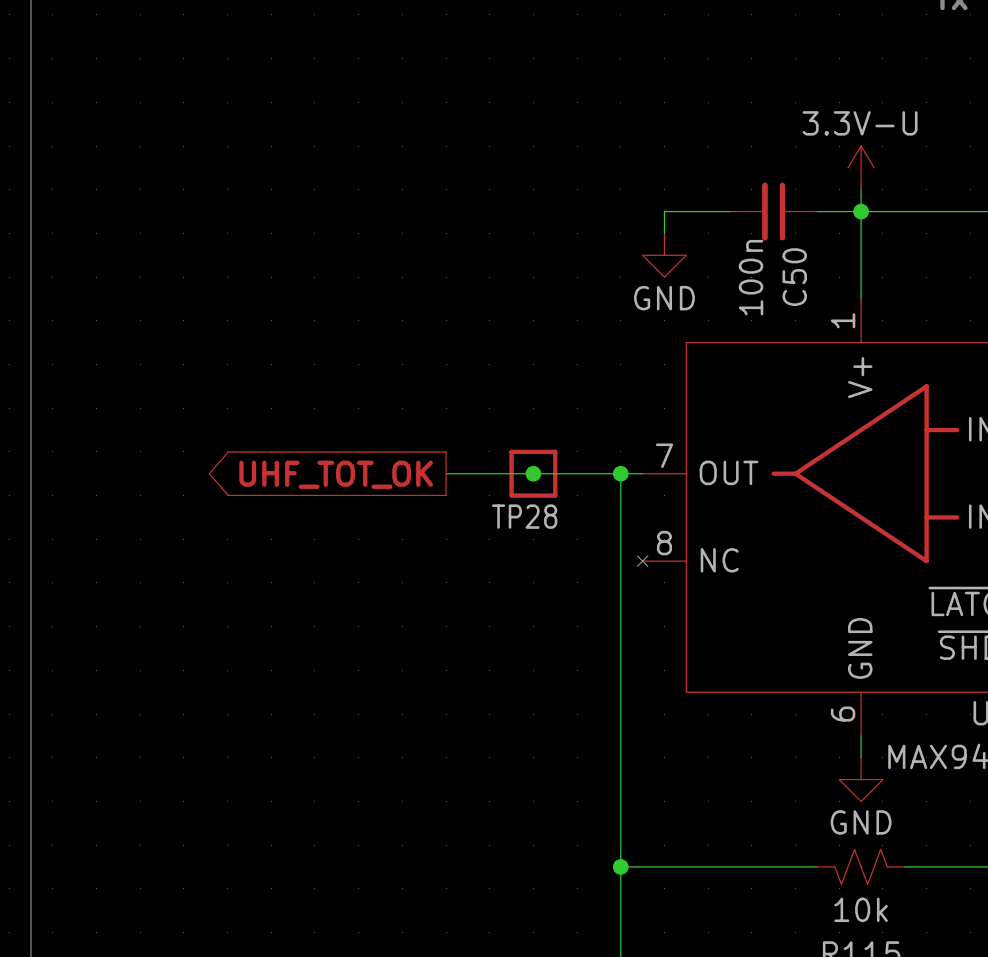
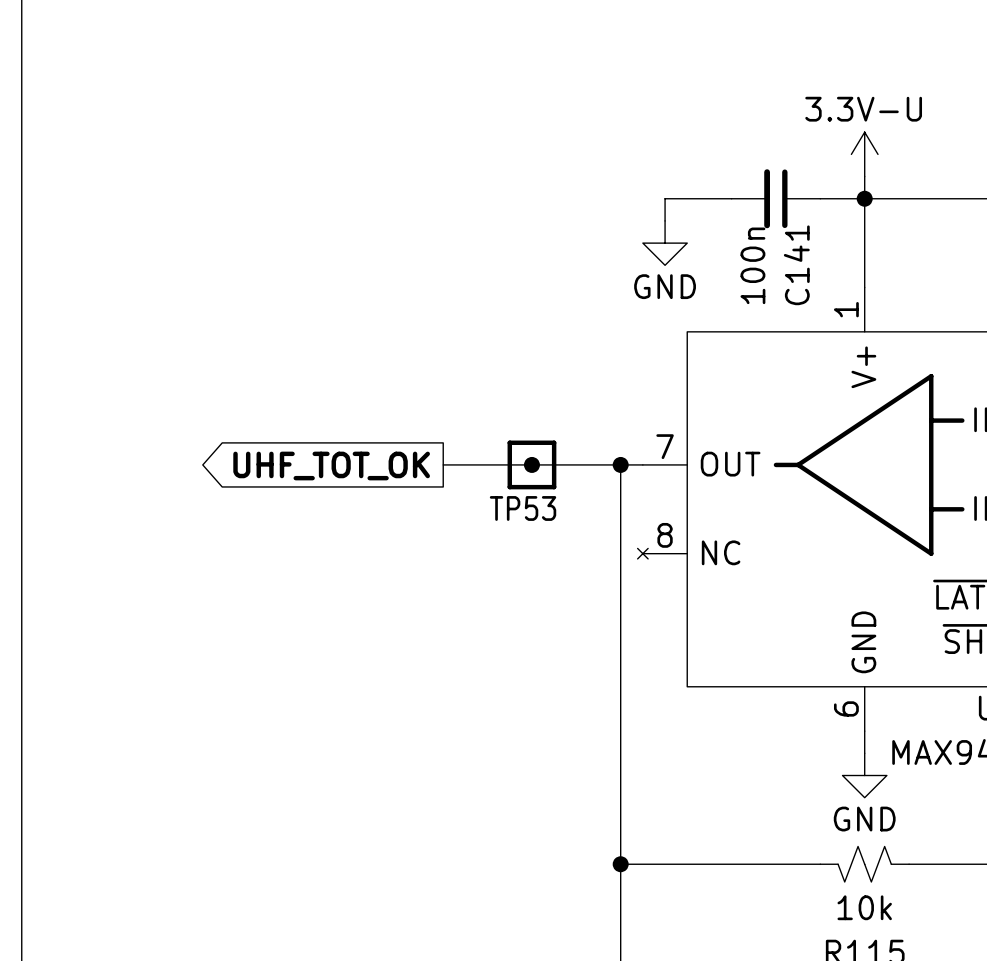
C50 name: C50 (794, 277) -> C141 (796, 265)
TP28 name: TP28 (524, 516) -> TP53 (523, 508)

